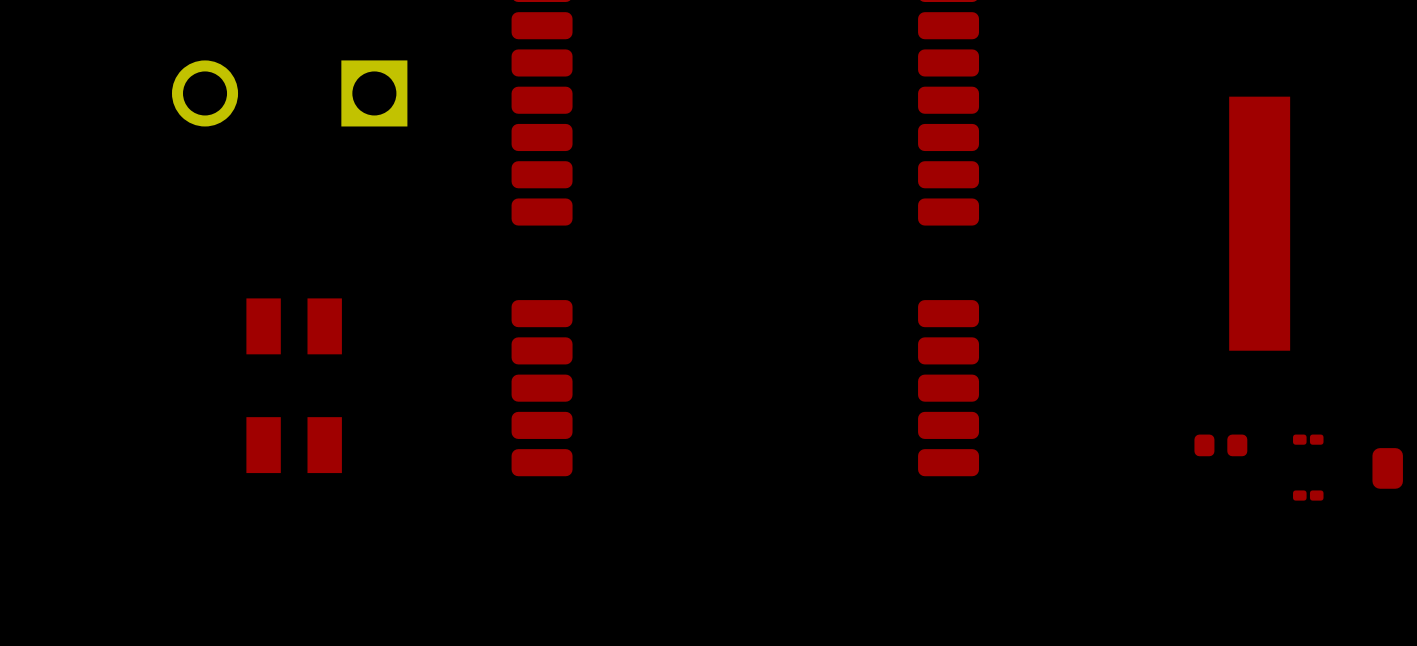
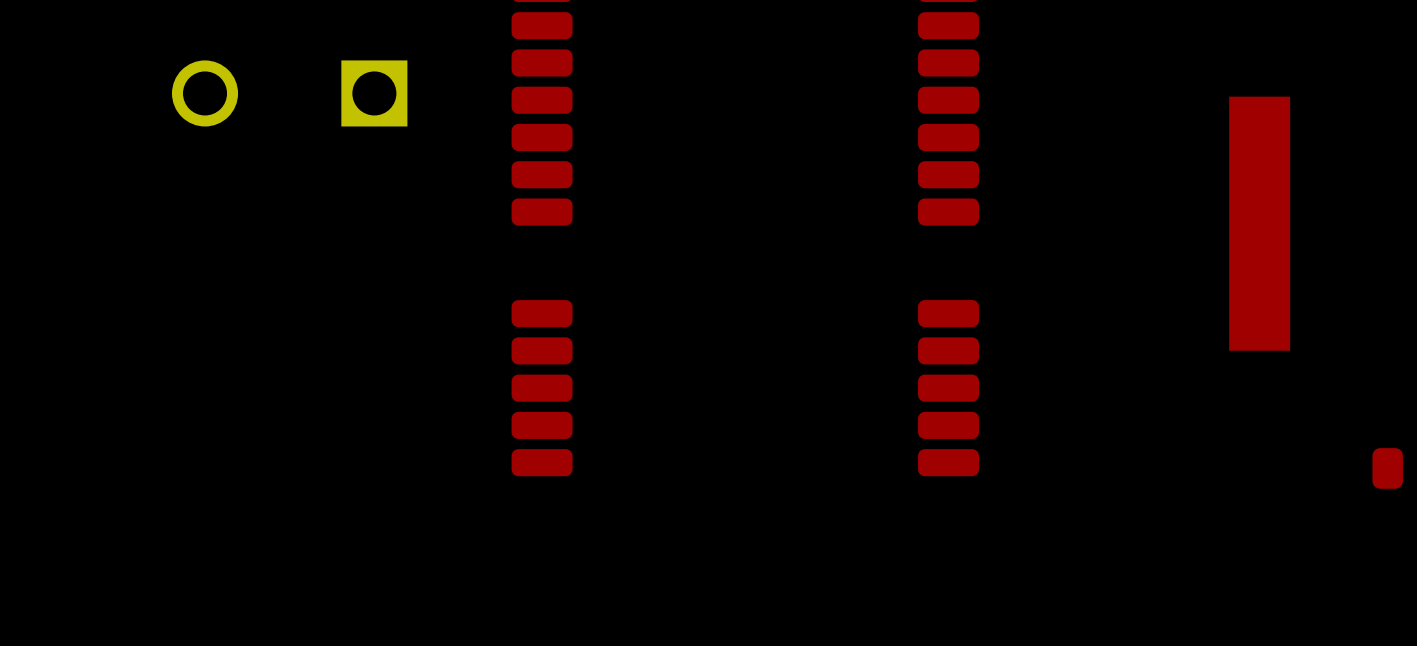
part: (294, 385) -> none
part: (1308, 439) -> none
part: (1220, 445) -> none
part: (1308, 495) -> none

